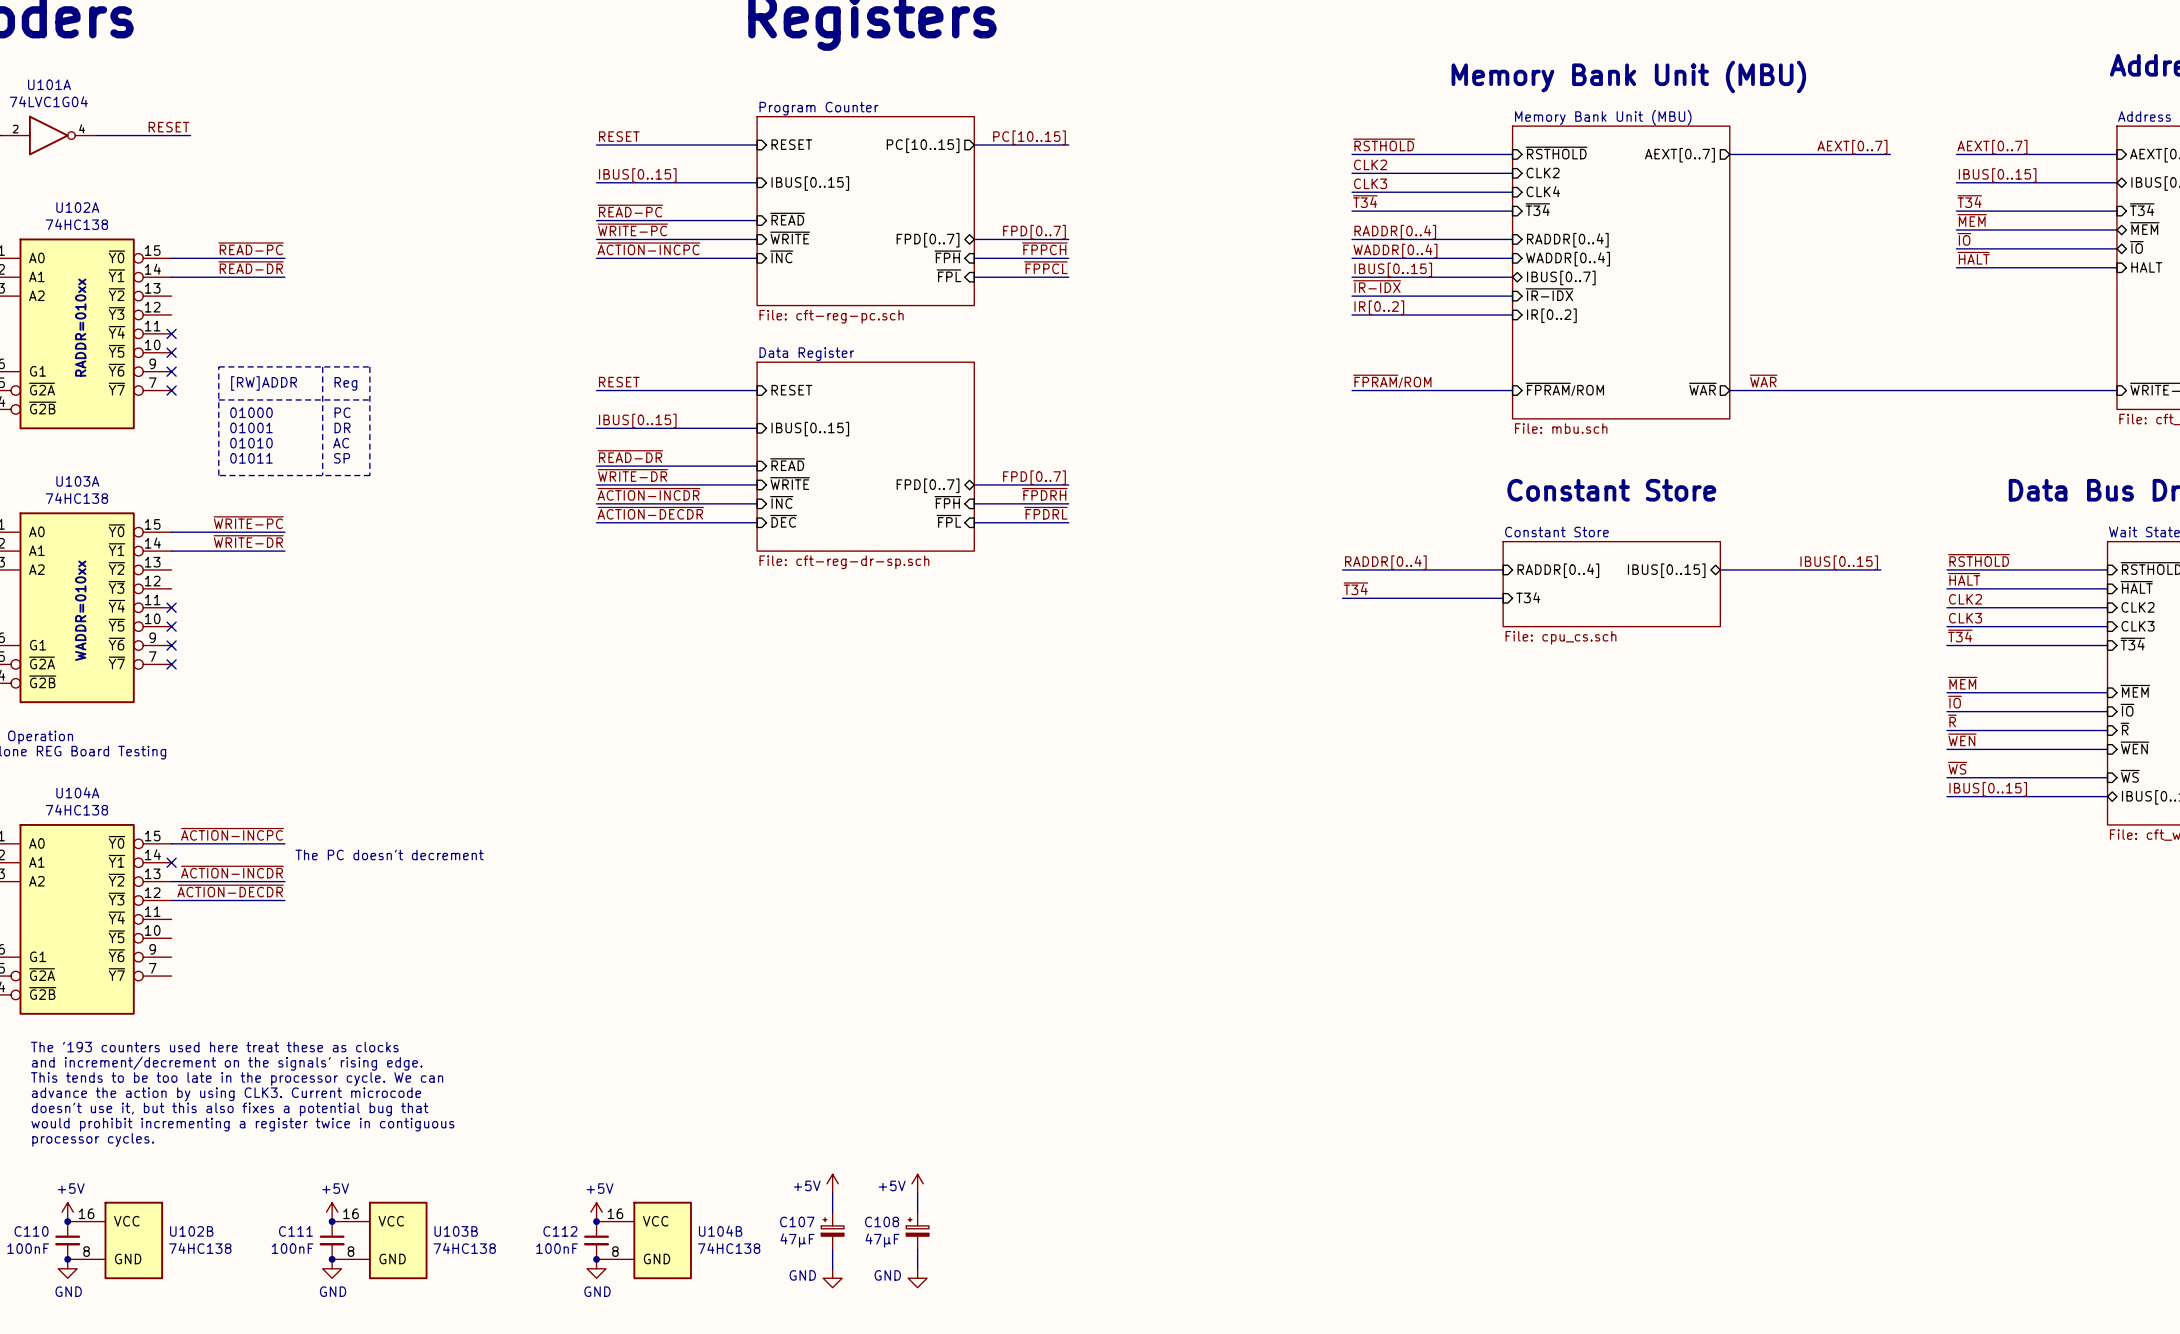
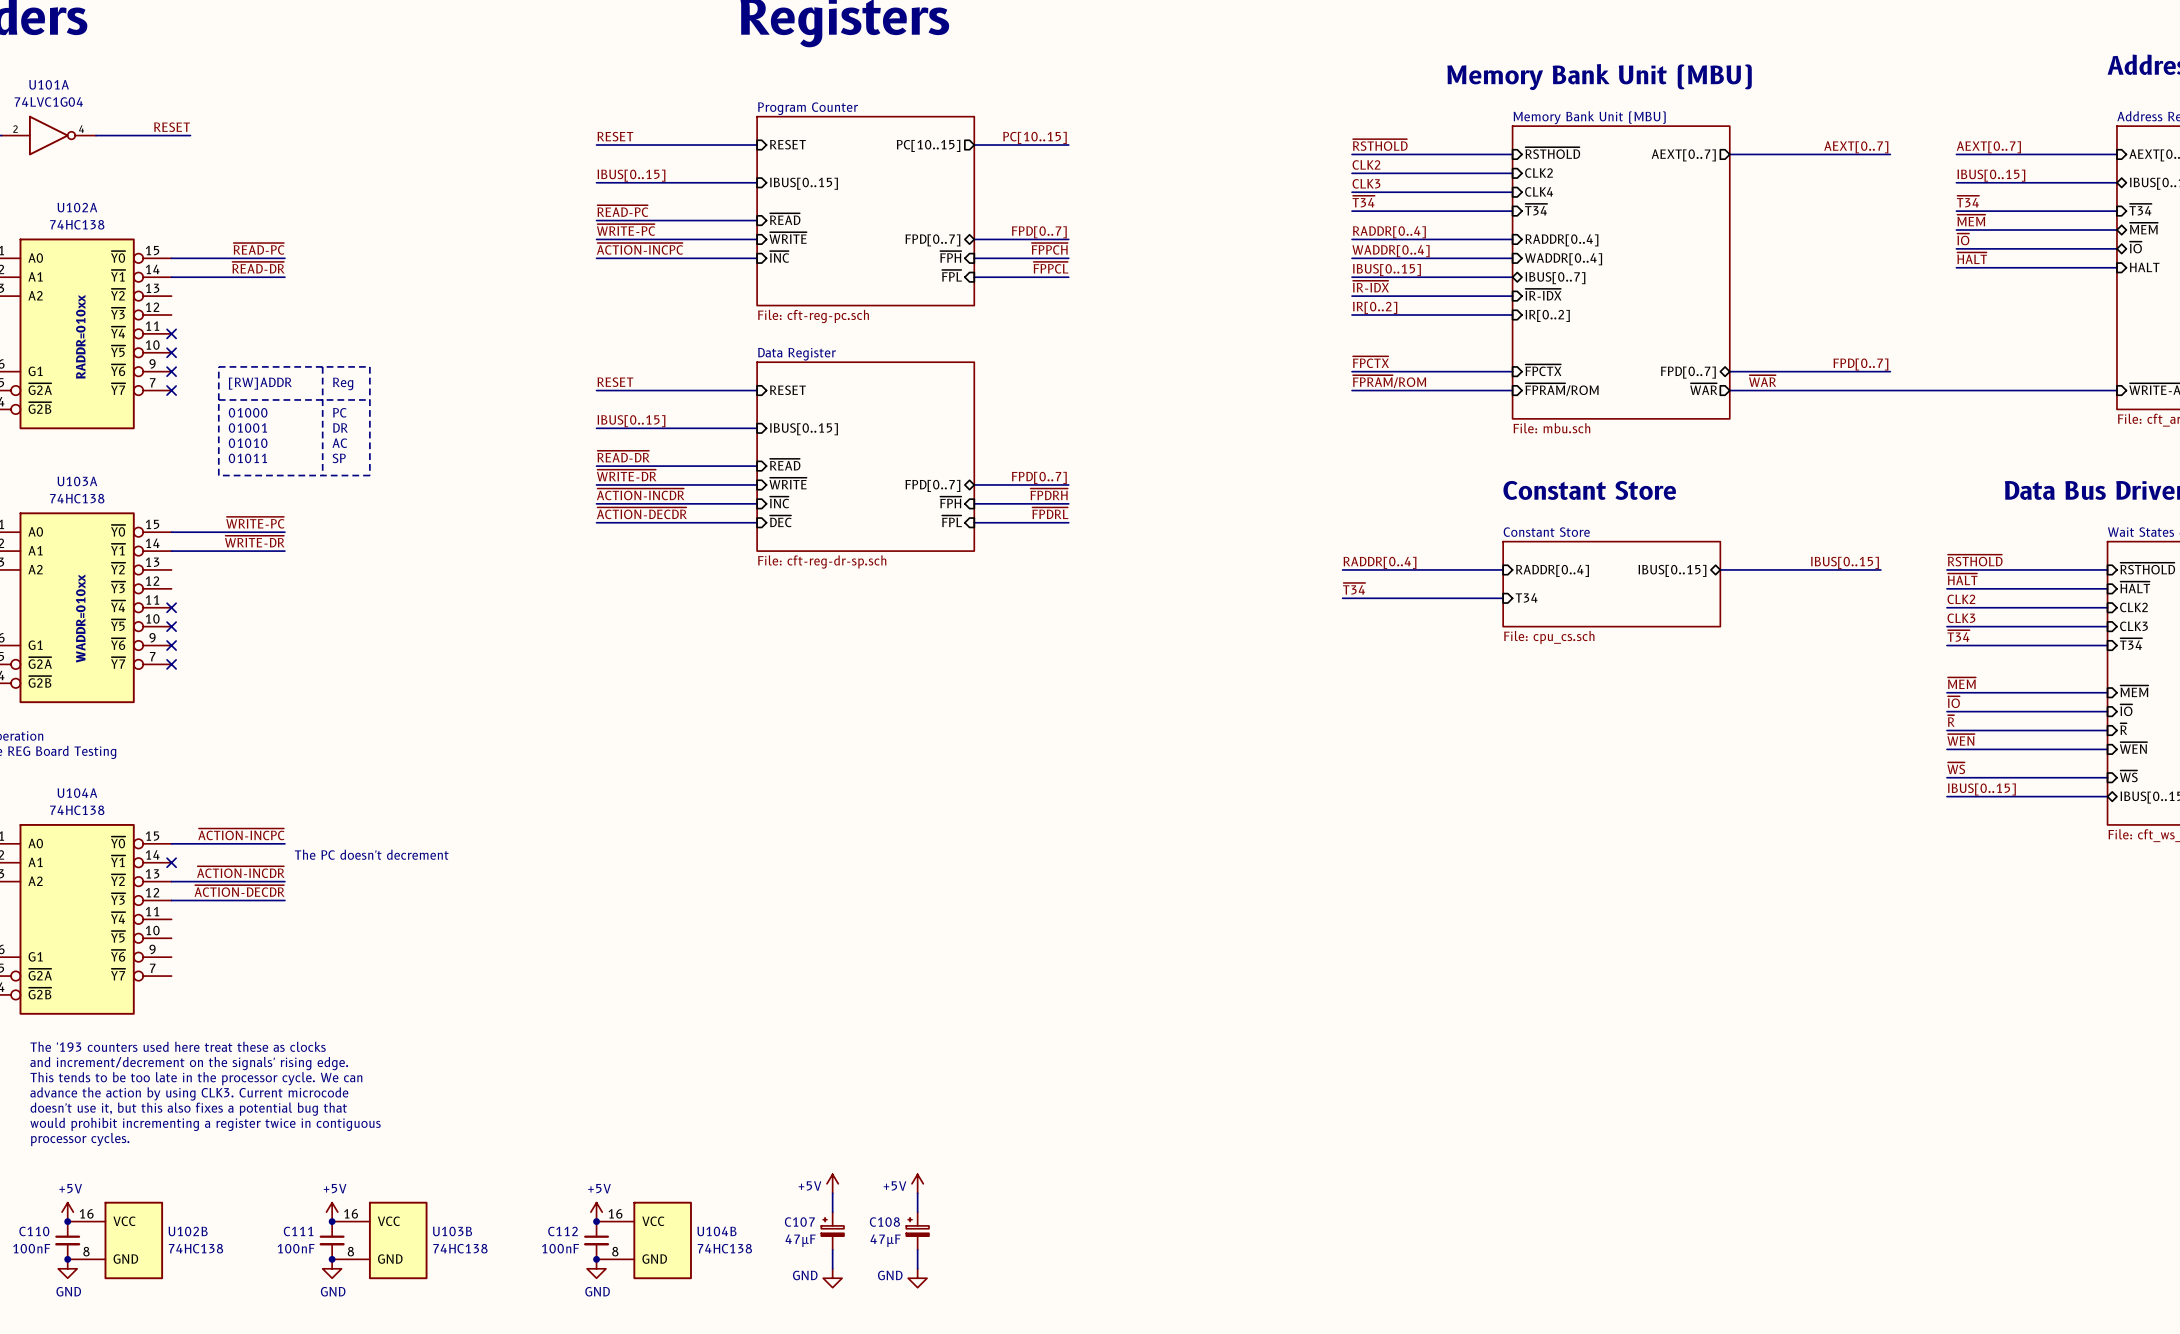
label: none -> ~{FPCTX} (1370, 362)
label: none -> FPD[0..7] (1861, 364)
sheet pin: none -> ~{FPCTX} (1543, 370)
wire: none -> (1352, 371) (1512, 371)
bus: none -> (1729, 371) (1890, 371)
sheet pin: none -> FPD[0..7] (1688, 372)

